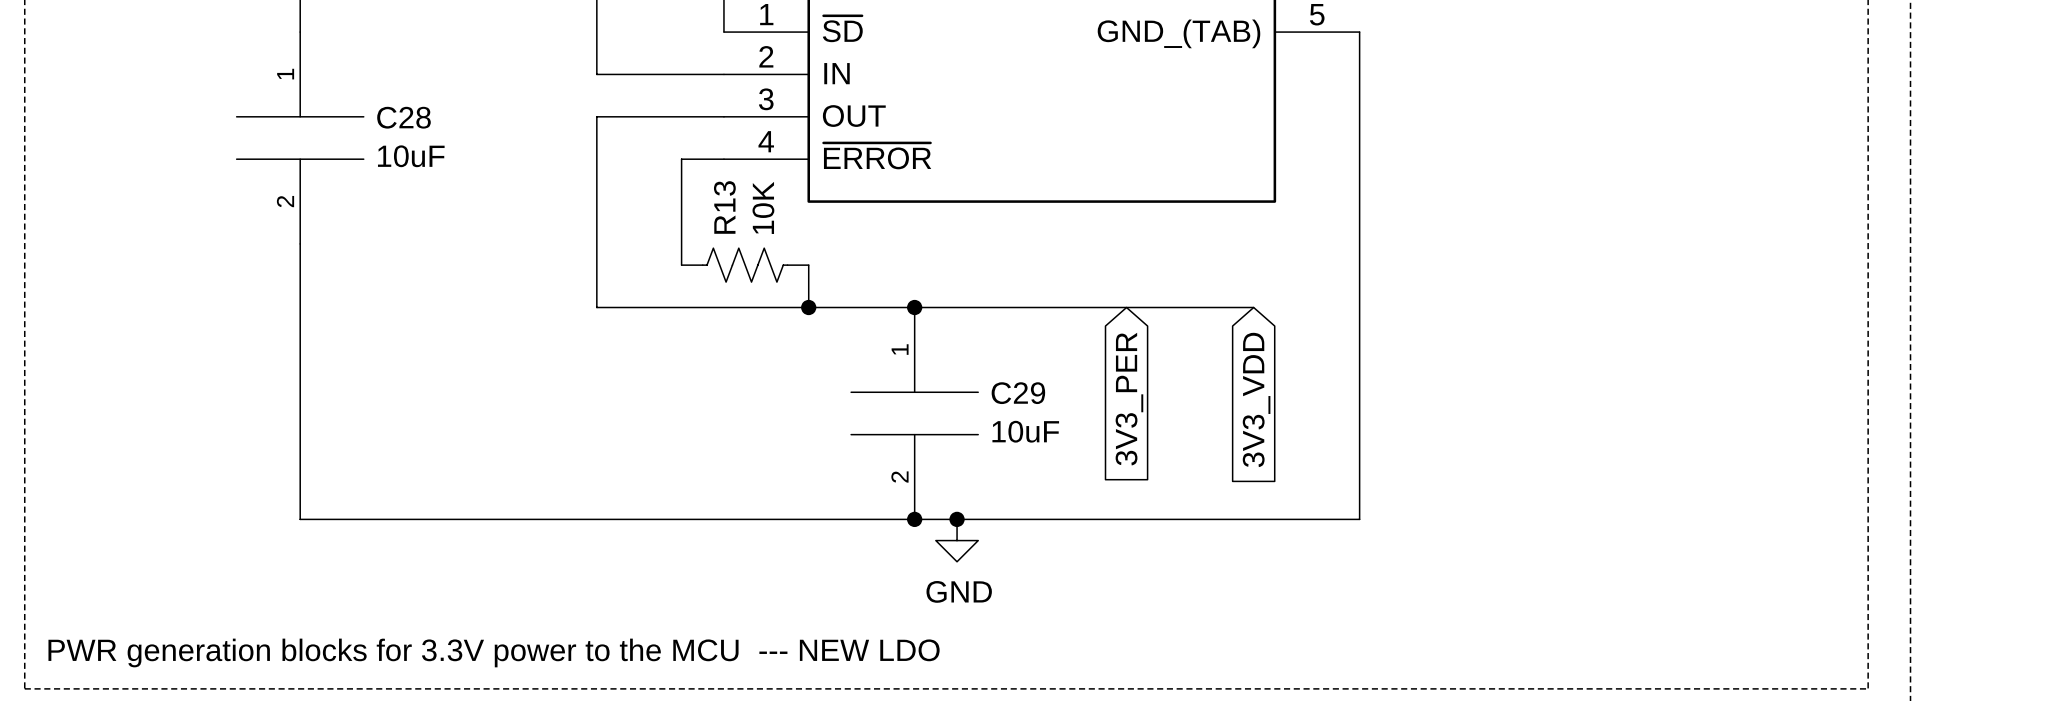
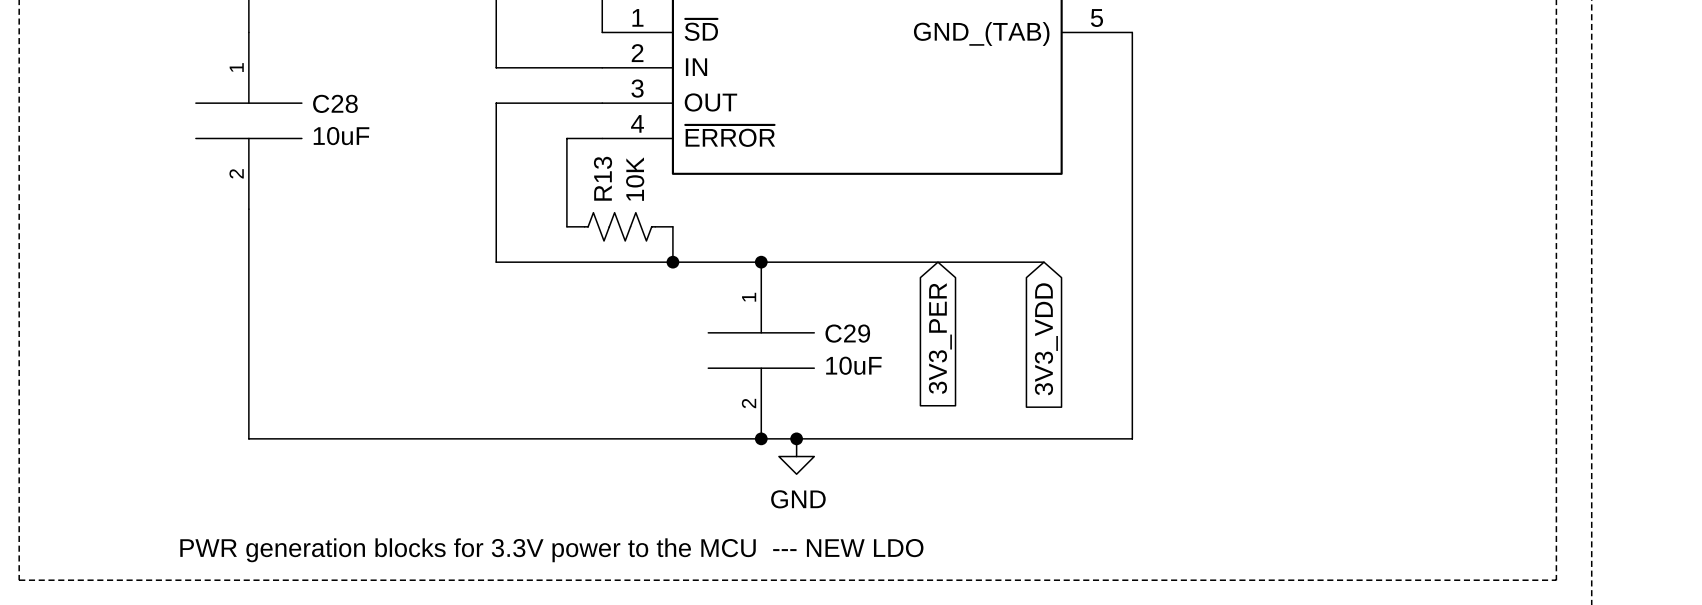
text position: PWR generation blocks for 3.3V power to the MCU --- NEW LDO (494, 652) -> PWR generation blocks for 3.3V power to the MCU --- NEW LDO (551, 550)

